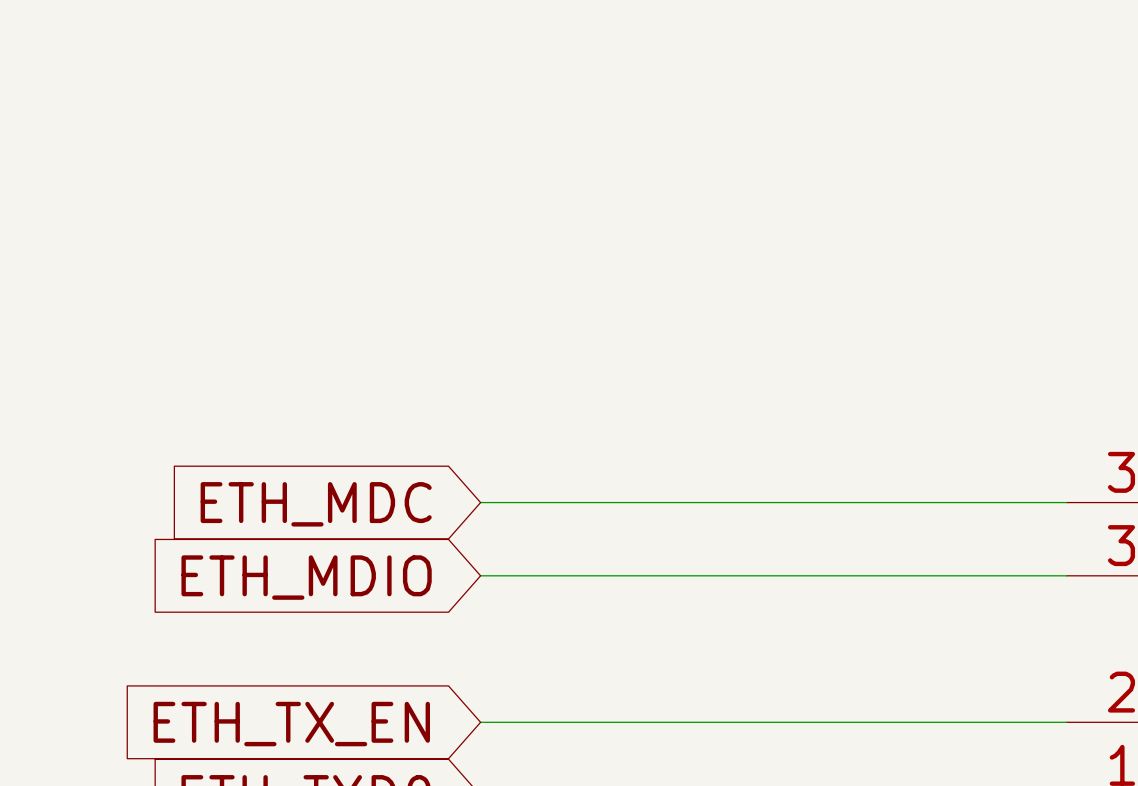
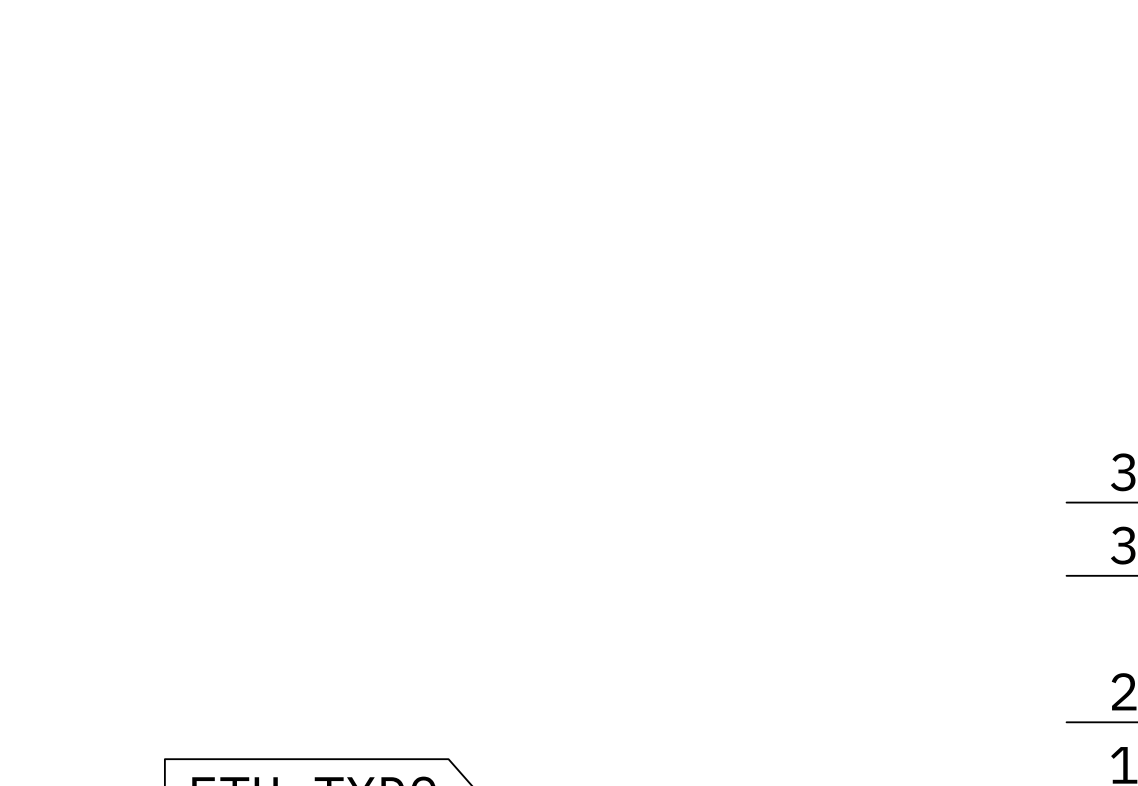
wire: (480, 502) (1066, 502) -> none
global label: ETH_MDC (316, 504) -> none
wire: (480, 575) (1066, 575) -> none
global label: ETH_MDIO (306, 577) -> none
wire: (480, 722) (1066, 722) -> none
global label: ETH_TX_EN (291, 724) -> none

